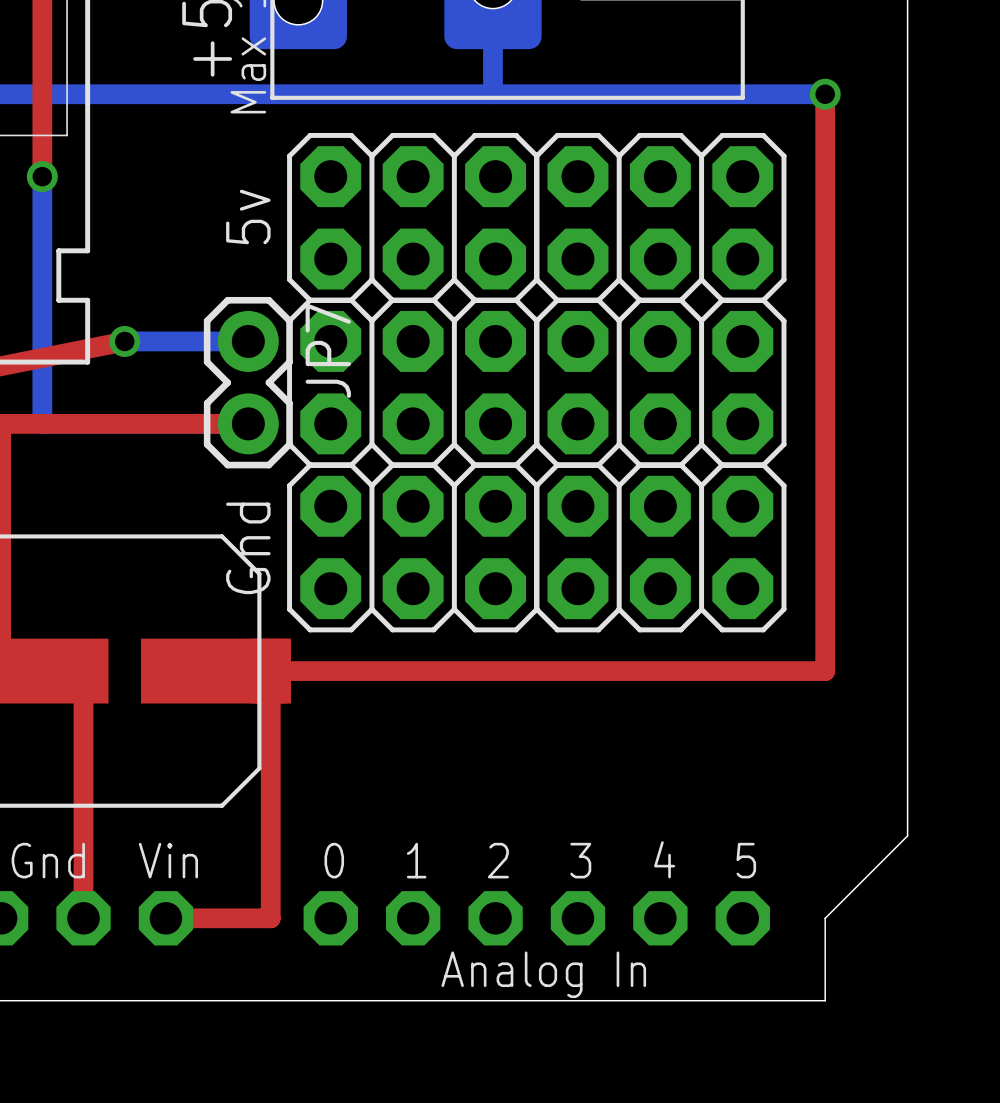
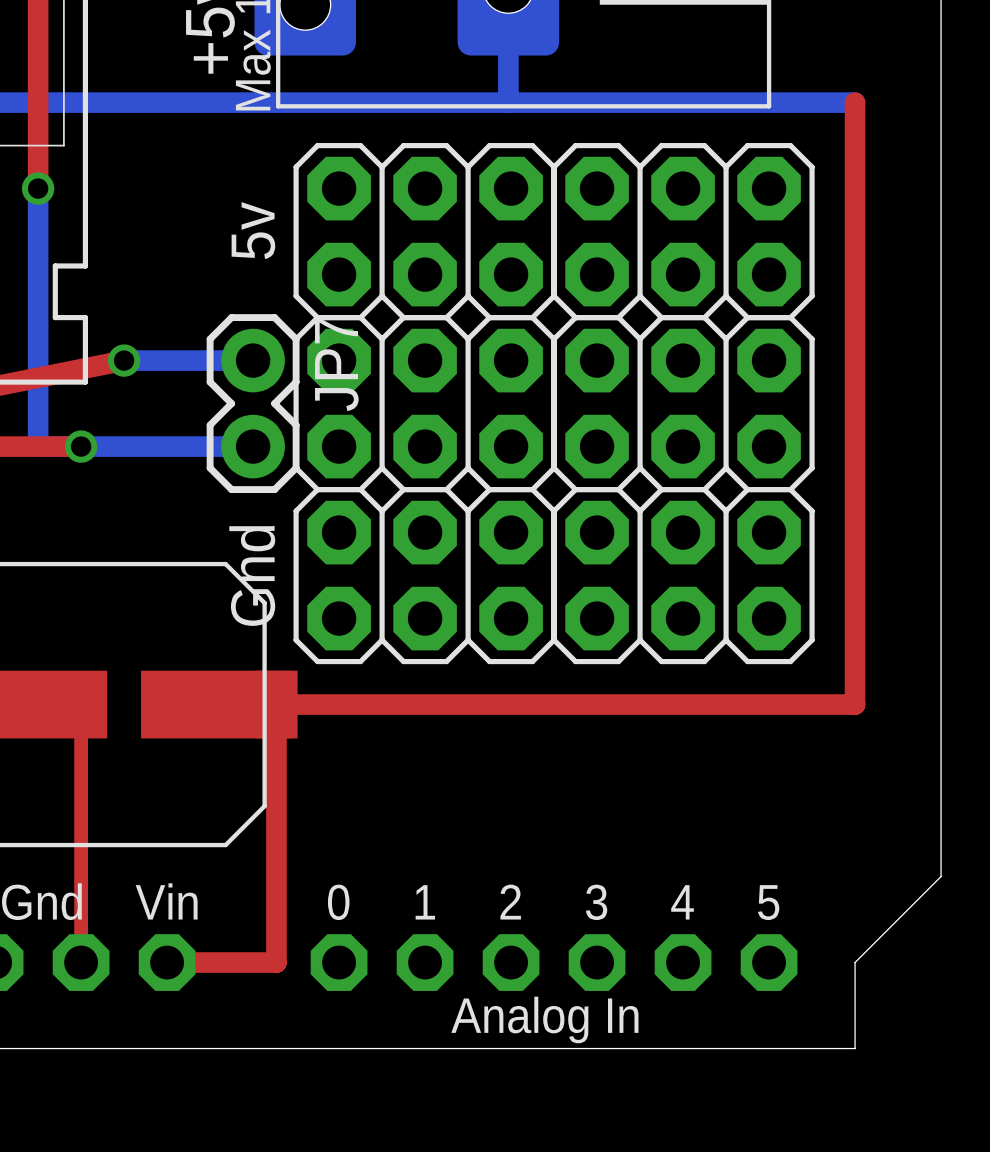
via: (825, 94) -> none
top track: (83, 423) (248, 423) -> none
via: none -> (81, 446)
top track width: thick (83, 671) (83, 918) -> thin (81, 704) (81, 962)

